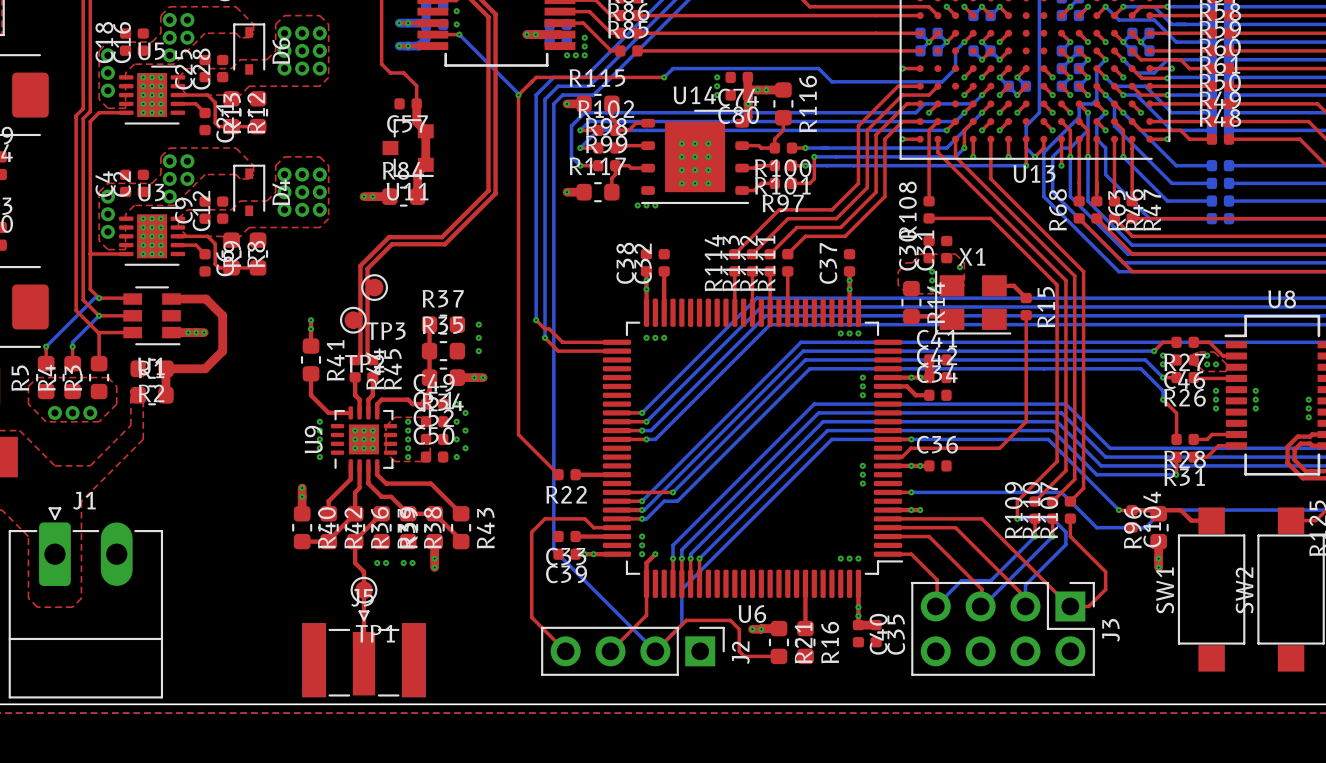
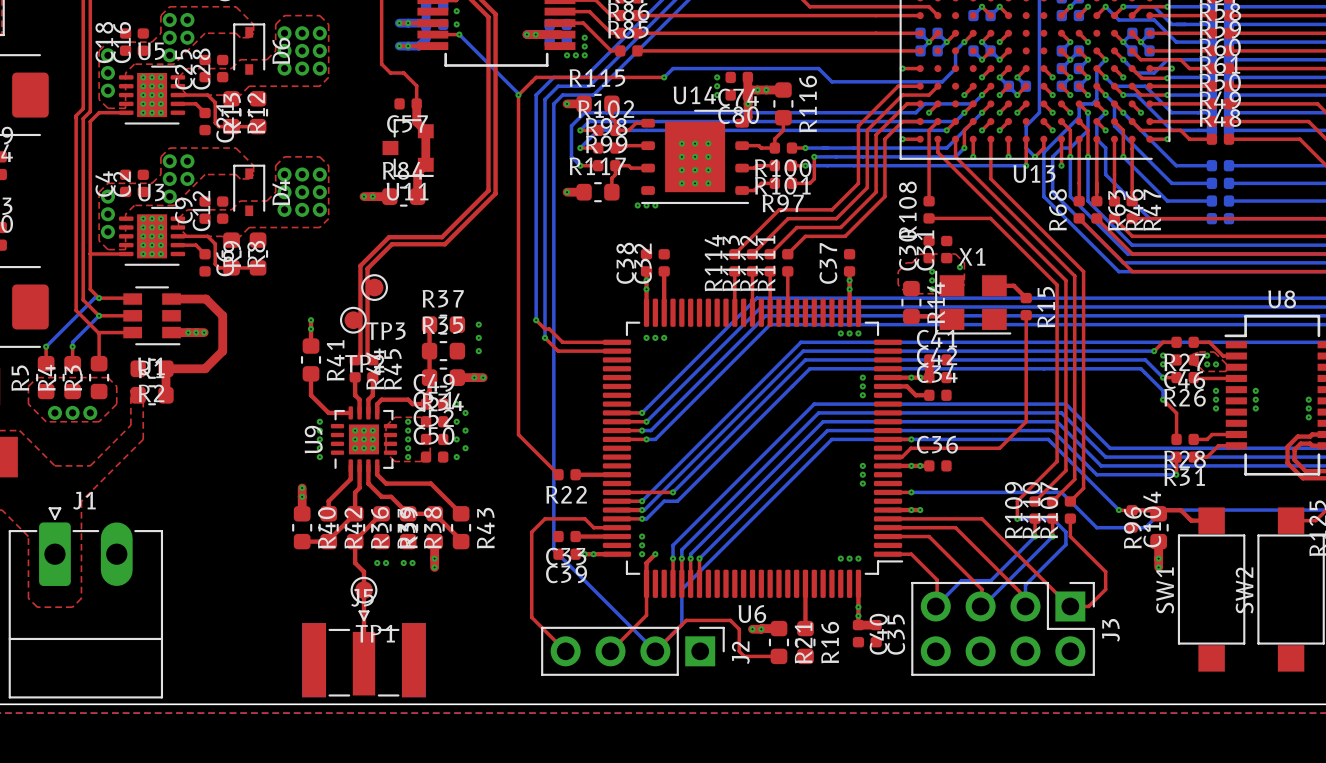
top track: (946, 6) (955, 15) -> none
via: (946, 6) -> none
top track: (964, 6) (973, 15) -> none
via: (964, 6) -> none
top track: (1096, 33) (1105, 42) -> none
via: (1105, 42) -> none
top track: (973, 68) (964, 77) -> none
via: (964, 77) -> none

